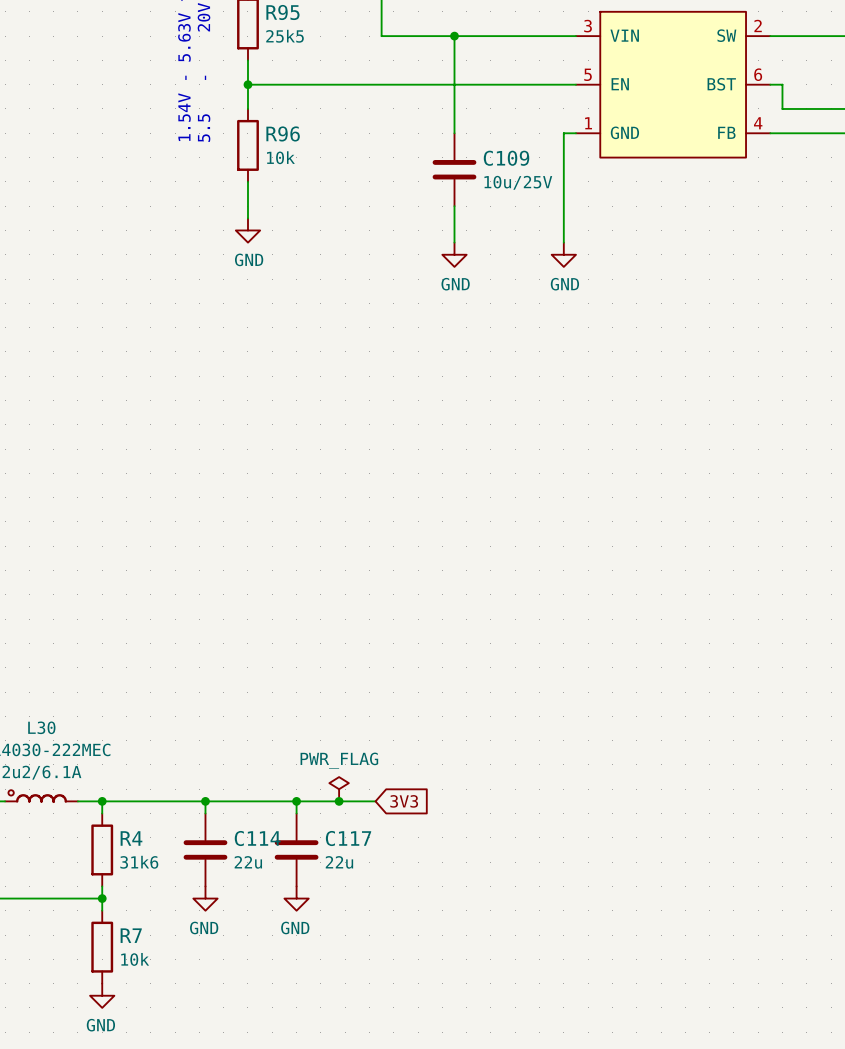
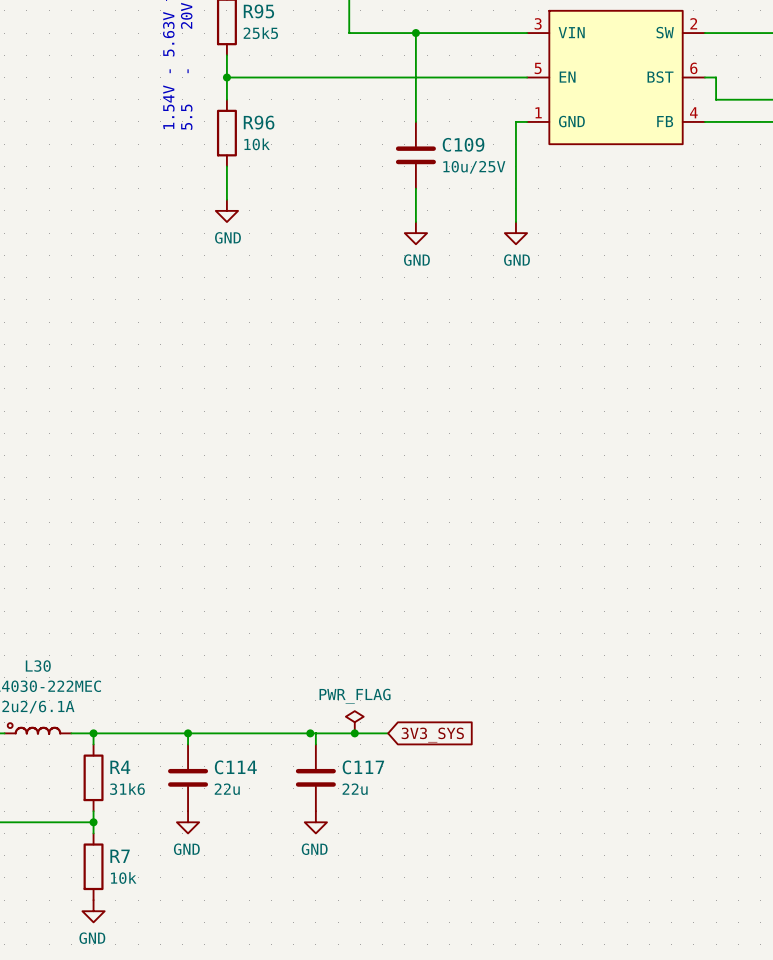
power symbol position: PWR_FLAG (339, 789) -> PWR_FLAG (354, 722)
wire: (296, 801) (296, 813) -> (315, 733) (315, 744)
junction: (296, 801) -> none
wire: none -> (343, 733) (388, 733)
junction: none -> (354, 733)
global label: 3V3 (404, 801) -> none
global label: none -> 3V3_SYS (432, 735)
C117 position: (296, 849) -> (315, 777)
power symbol position: GND (296, 898) -> GND (315, 822)

